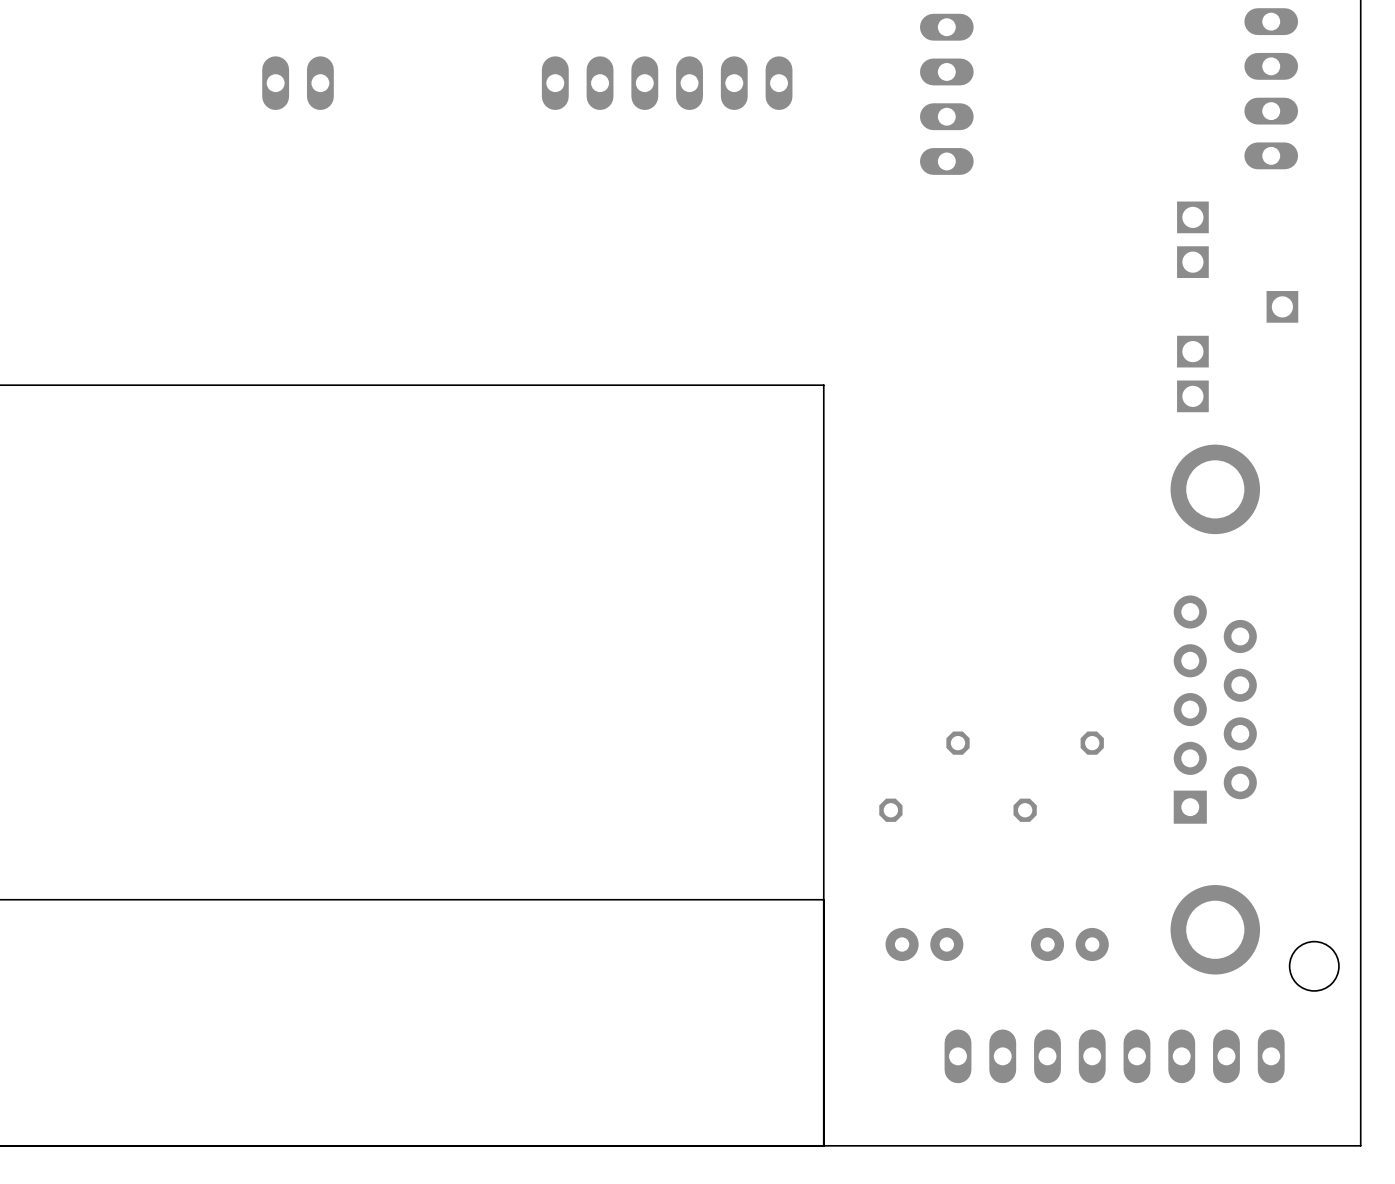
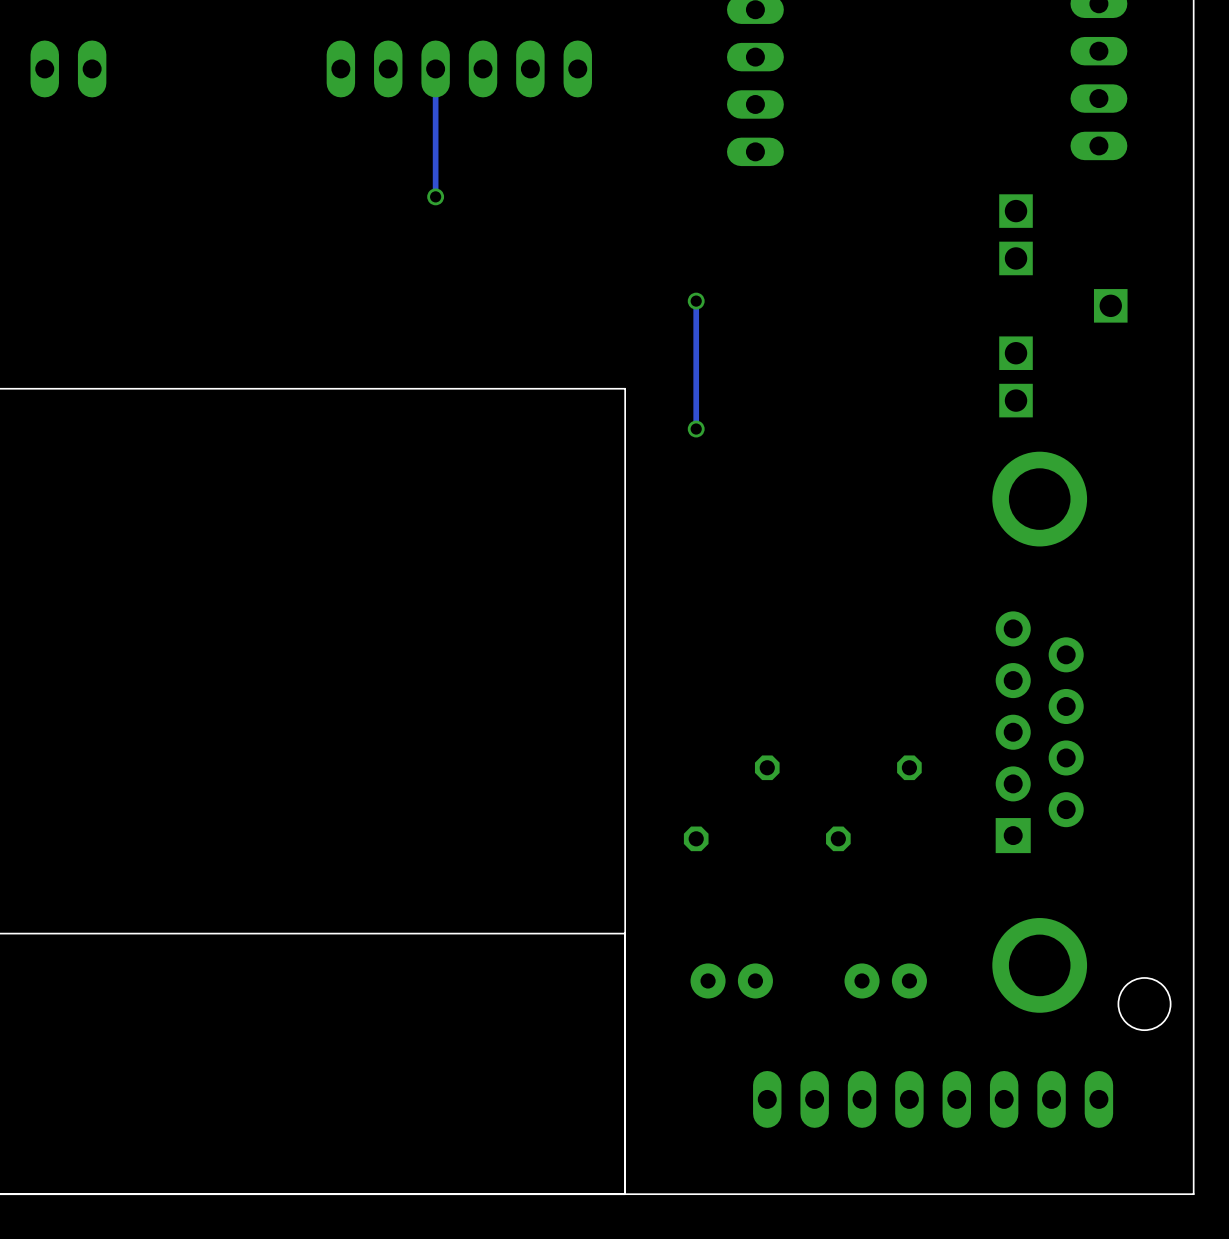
track: none -> (435, 68) (435, 196)
via: none -> (435, 196)
track: none -> (696, 301) (696, 429)
via: none -> (696, 301)
via: none -> (696, 429)

